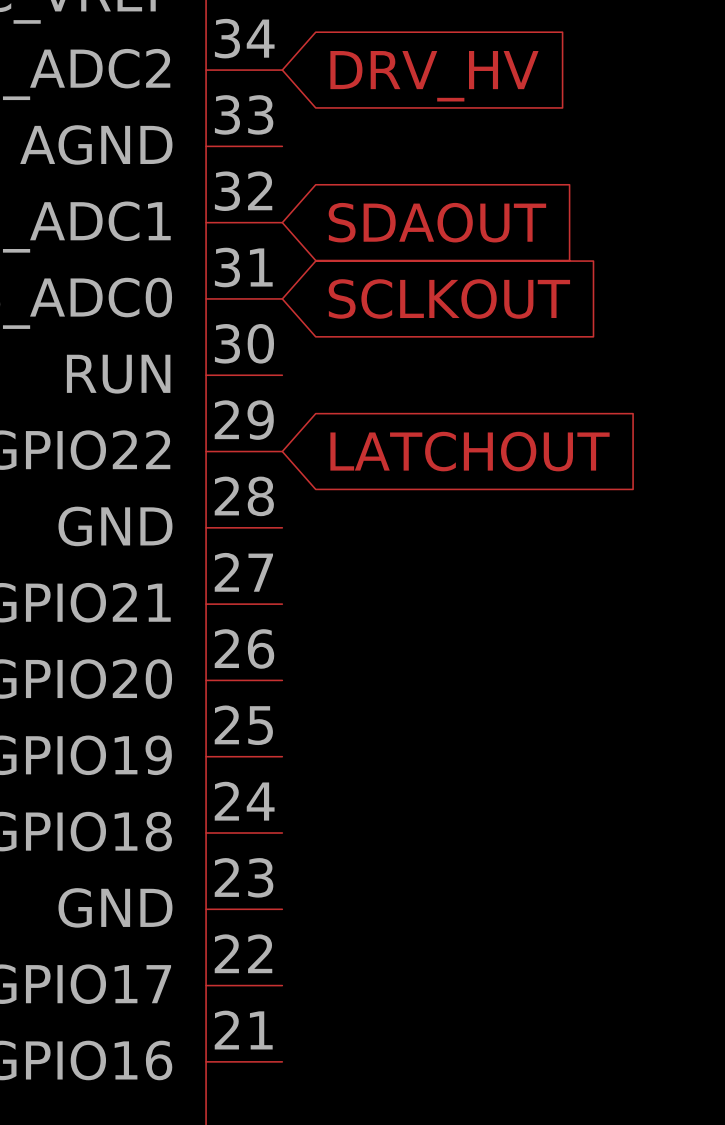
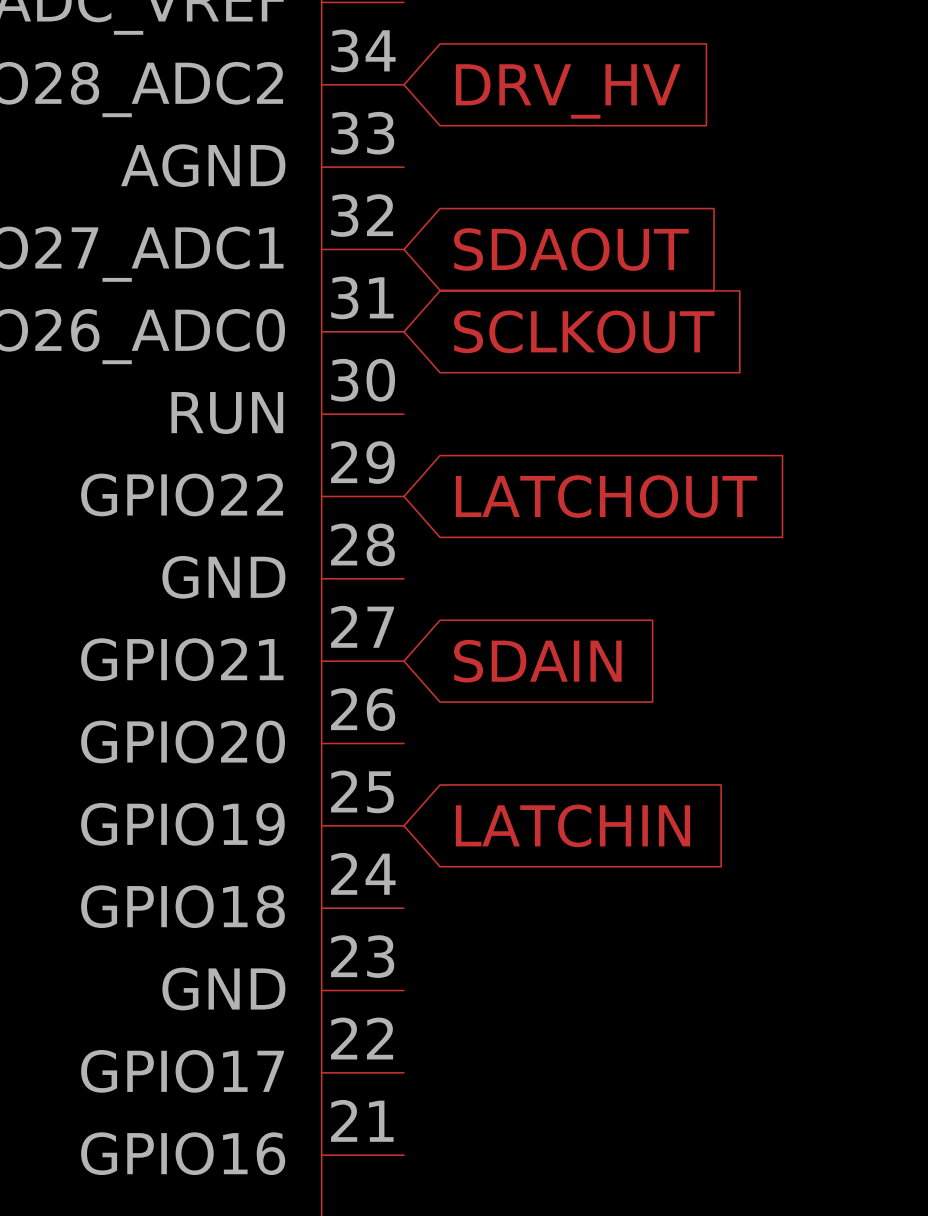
global label: none -> SDAIN (537, 661)
global label: none -> LATCHIN (573, 825)

